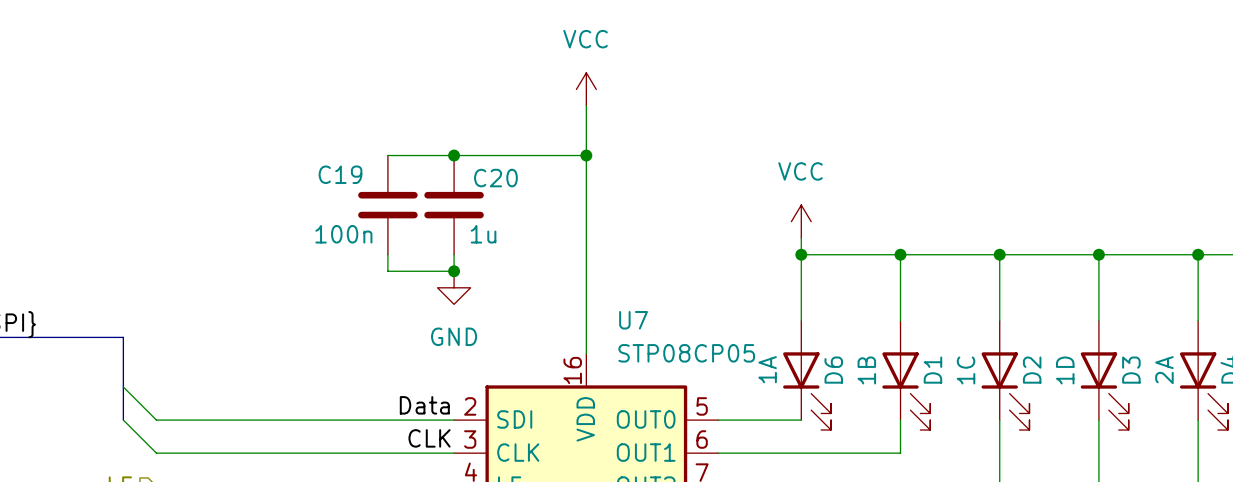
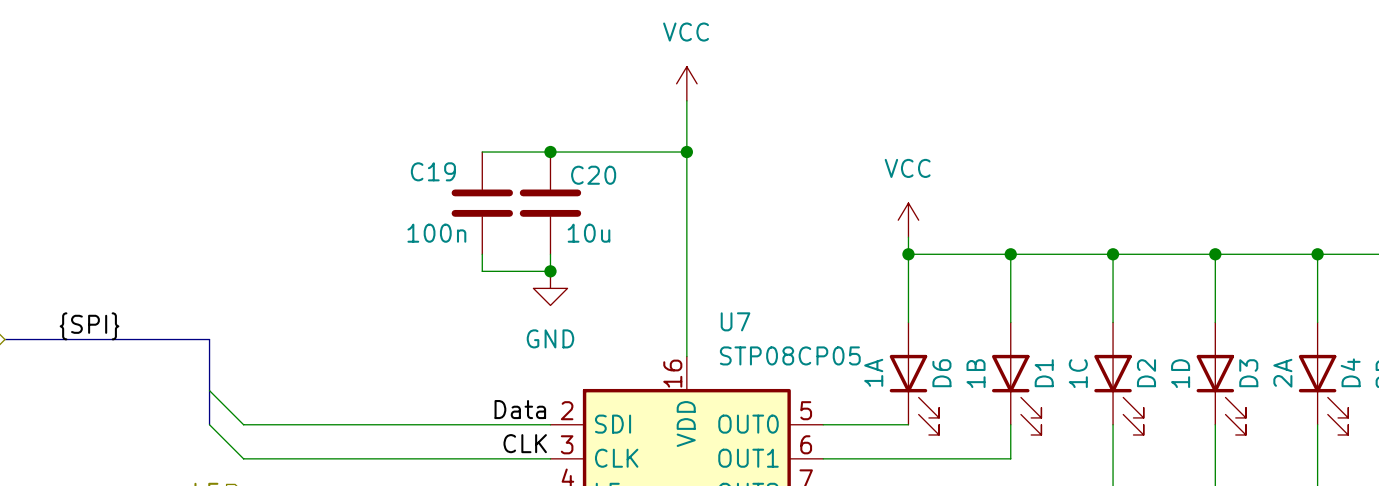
C20 value: 1u (483, 234) -> 10u (589, 233)

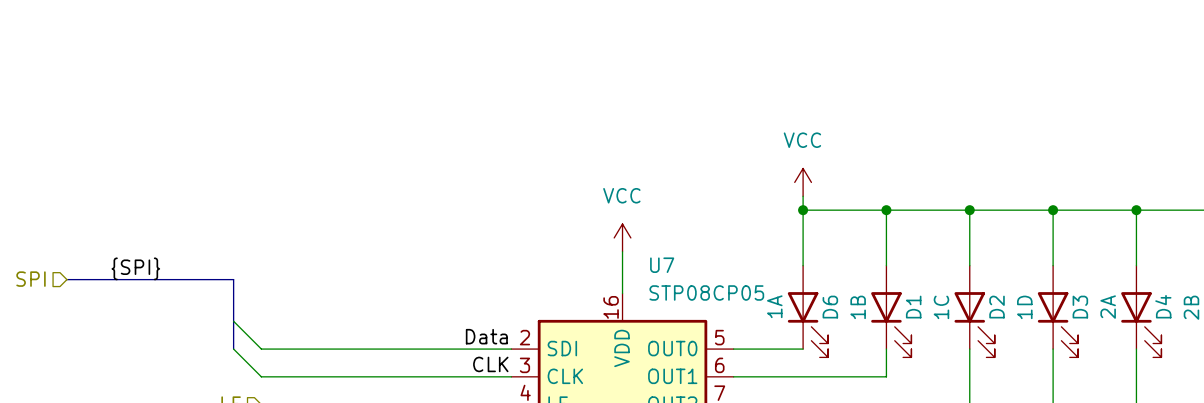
power symbol position: VCC (686, 83) -> VCC (622, 237)
wire: (686, 100) (686, 305) -> none
wire: (482, 152) (686, 152) -> none
junction: (550, 152) -> none
junction: (686, 152) -> none
C19: 100n (482, 203) -> none
C20: 10u (550, 203) -> none
wire: (482, 254) (482, 271) (550, 271) (550, 254) -> none
junction: (550, 271) -> none
power symbol: GND (550, 288) -> none

